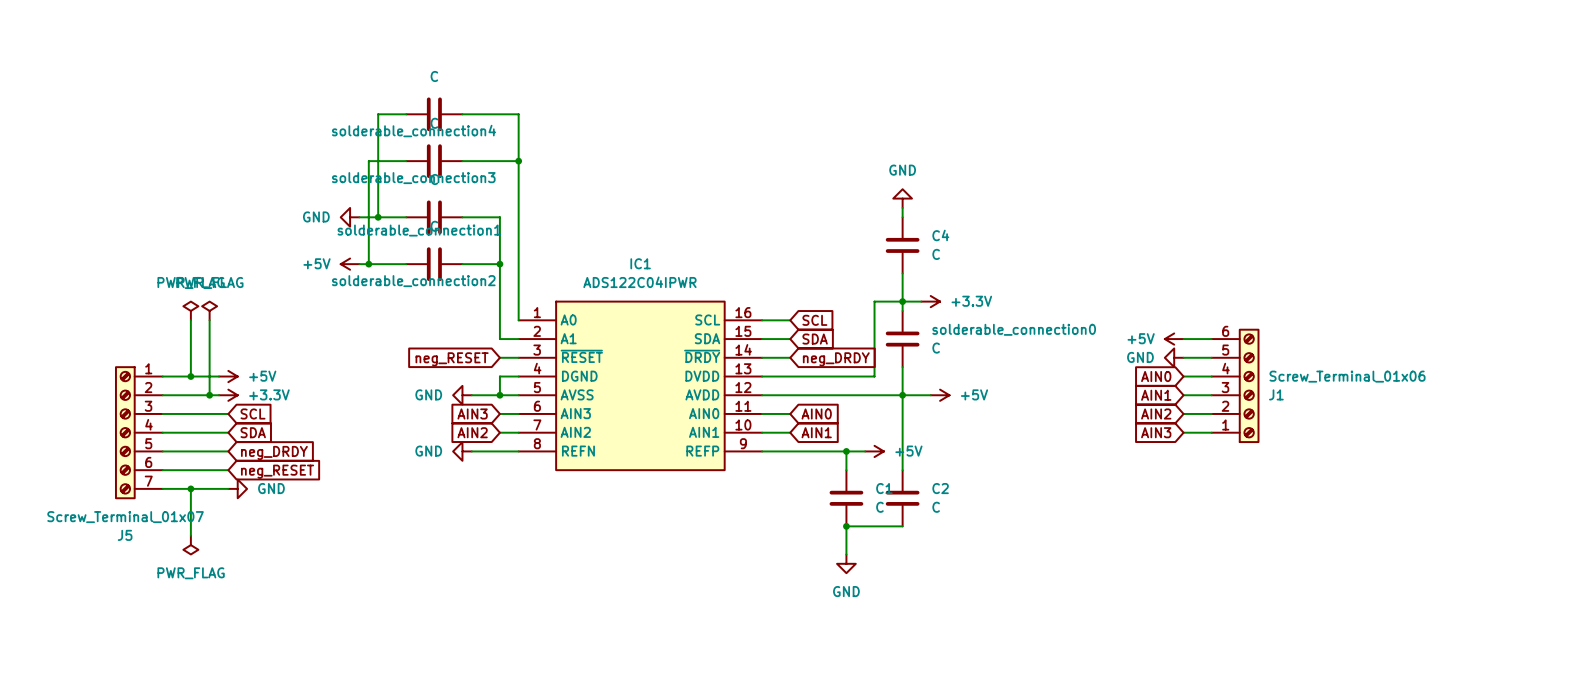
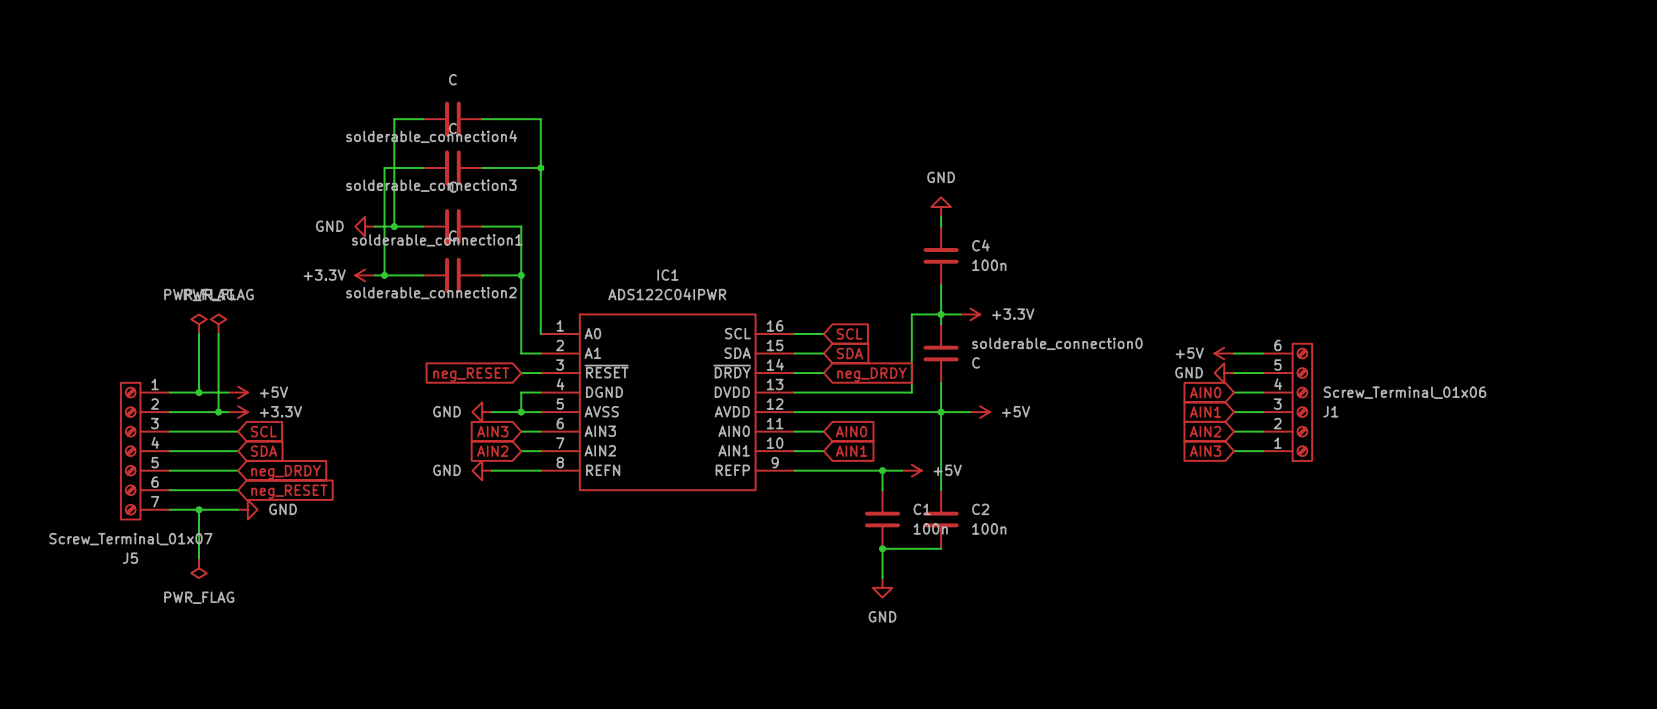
C4 value: C (936, 254) -> 100n (989, 265)
power symbol: +5V (350, 264) -> +3.3V (365, 275)
C1 value: C (879, 507) -> 100n (930, 528)
C2 value: C (936, 507) -> 100n (989, 528)

